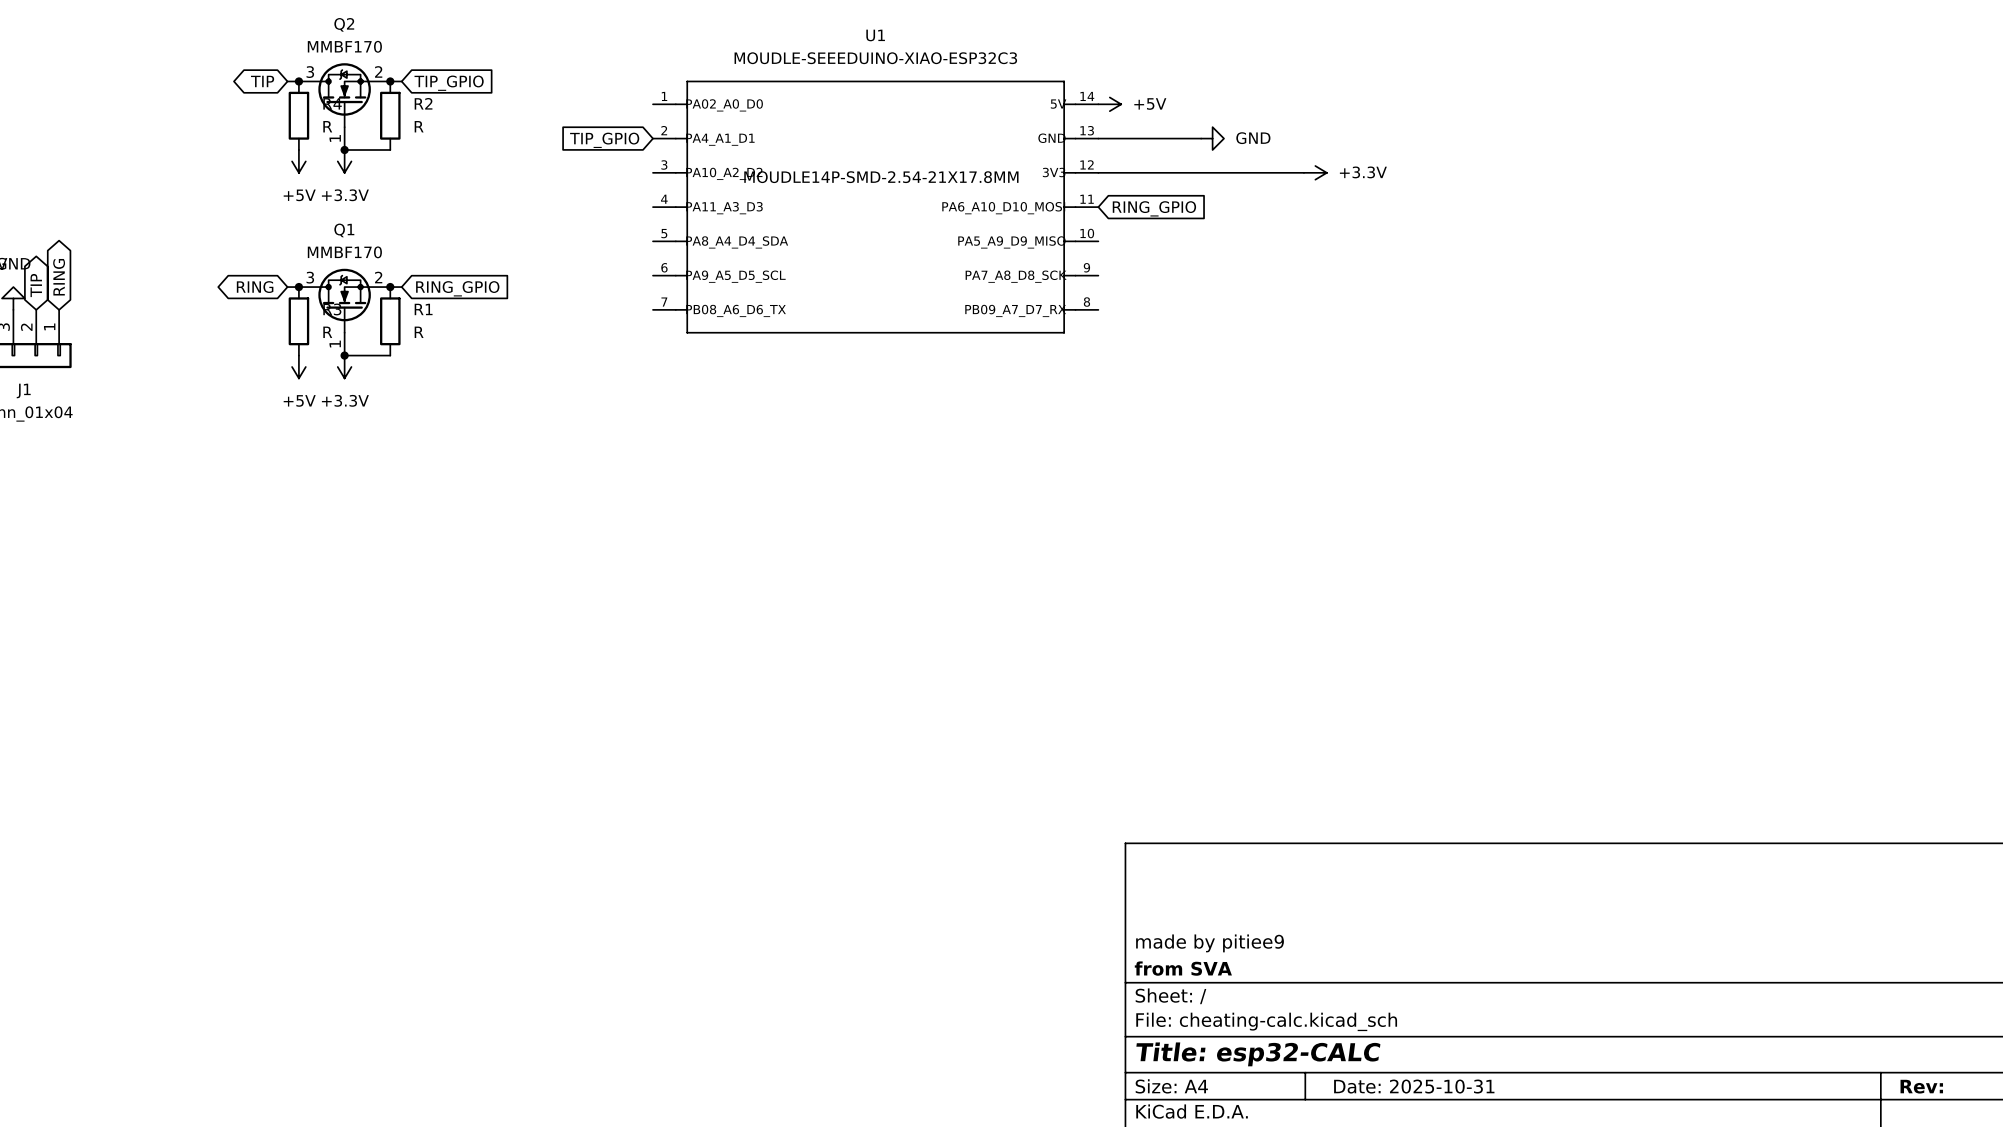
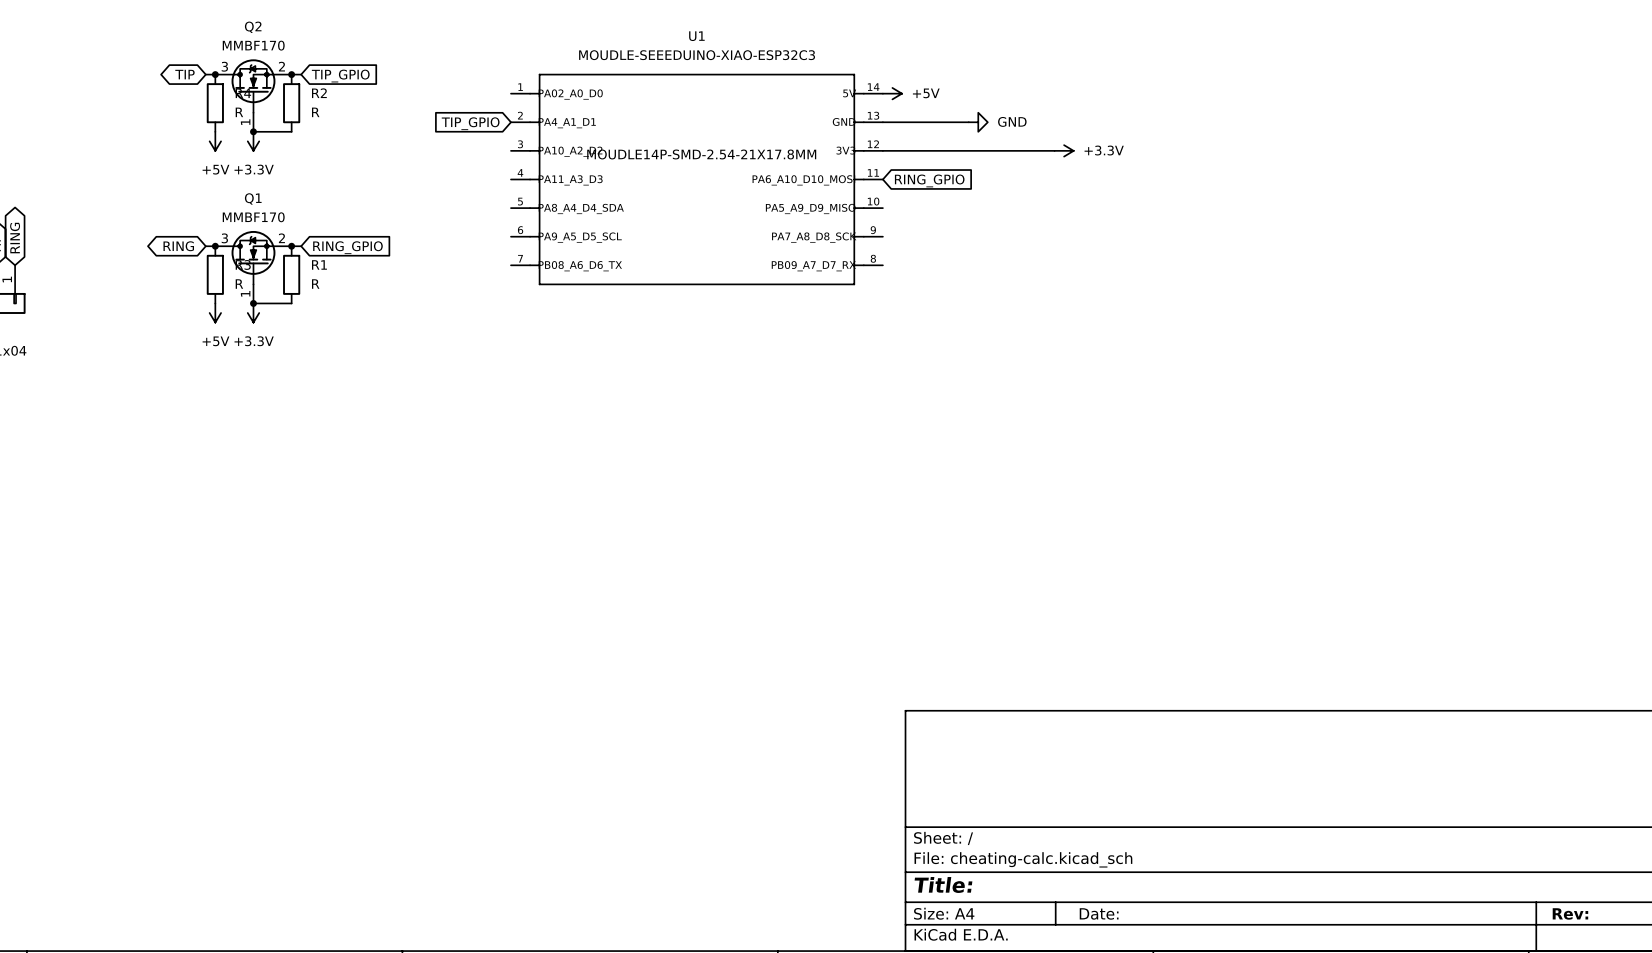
title block: made by pitiee9 (1210, 943) -> none
title block: from SVA (1183, 968) -> none
title block: Title: esp32-CALC (1258, 1054) -> Title: (943, 884)
title block: Date: 2025-10-31 (1414, 1086) -> Date: (1099, 913)

